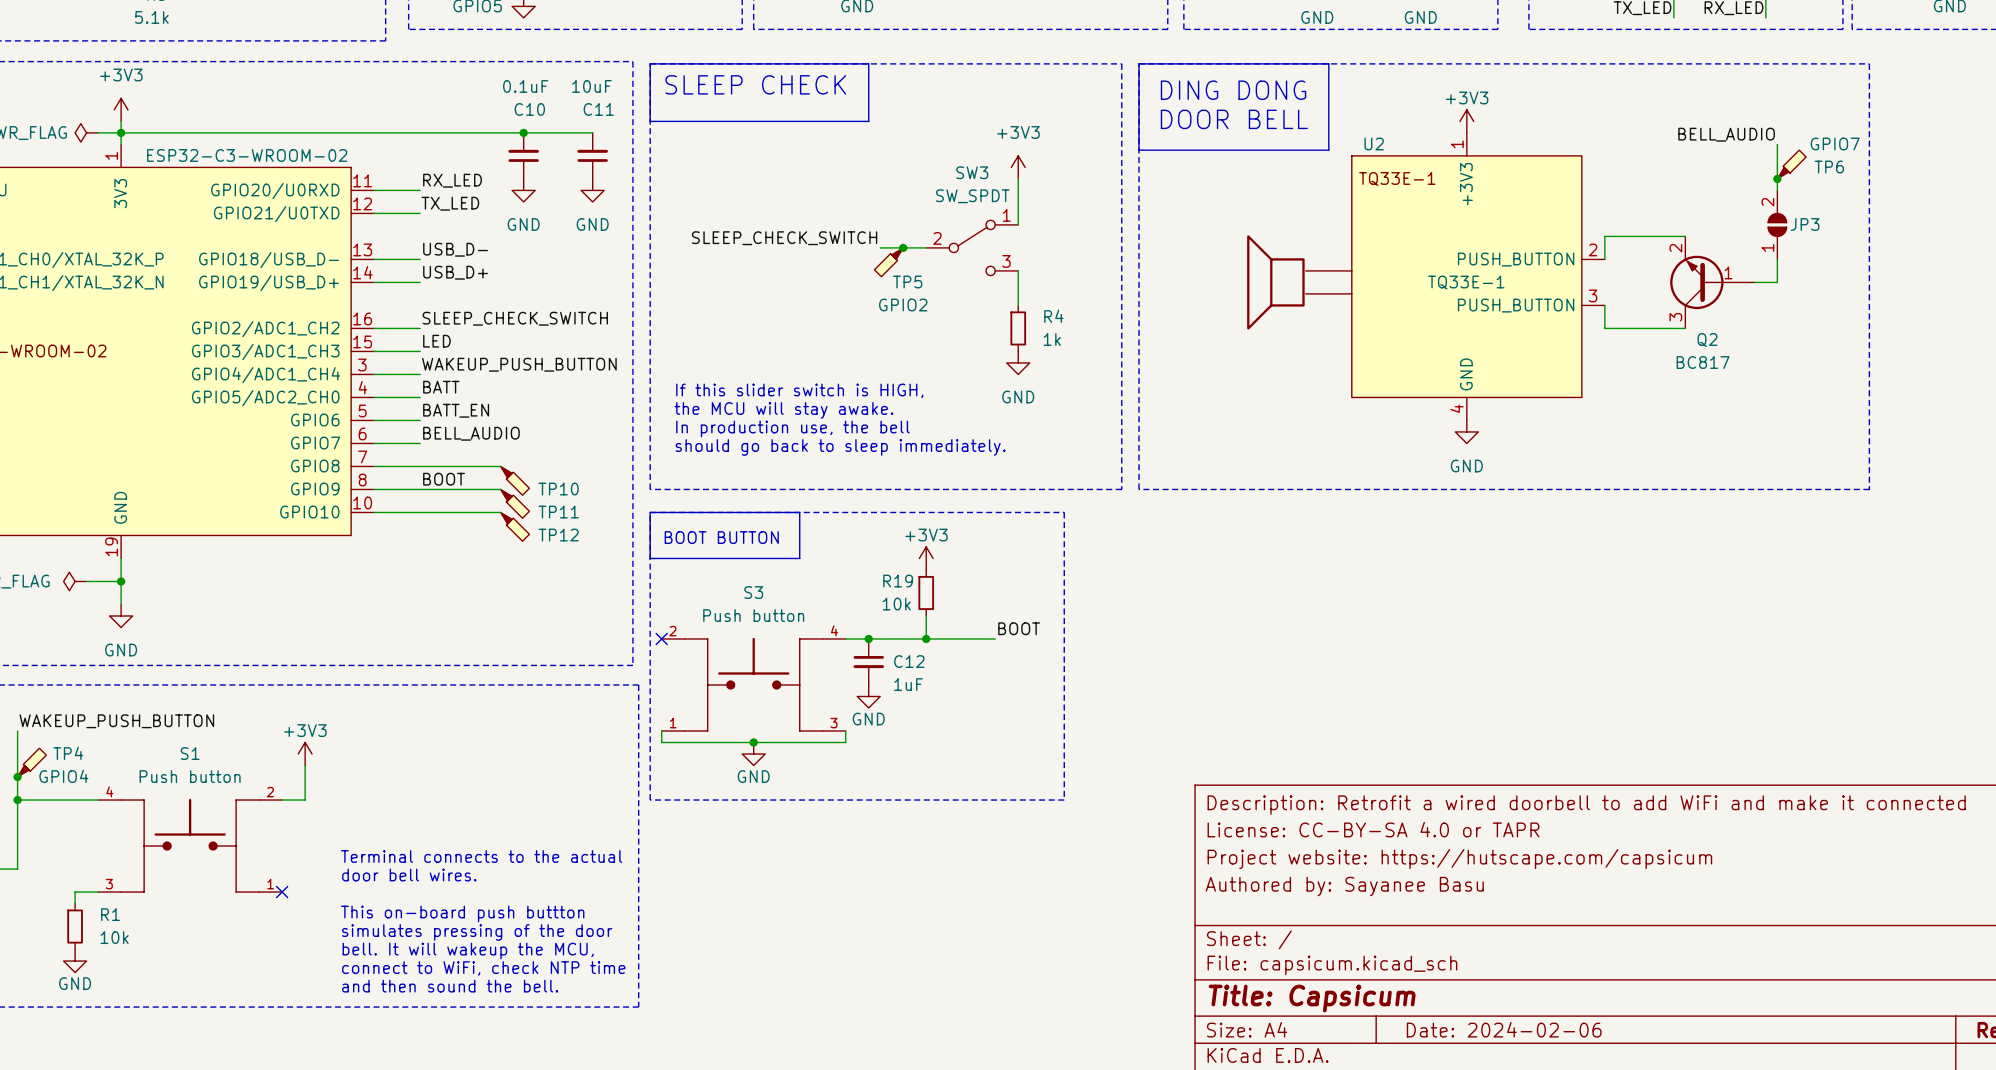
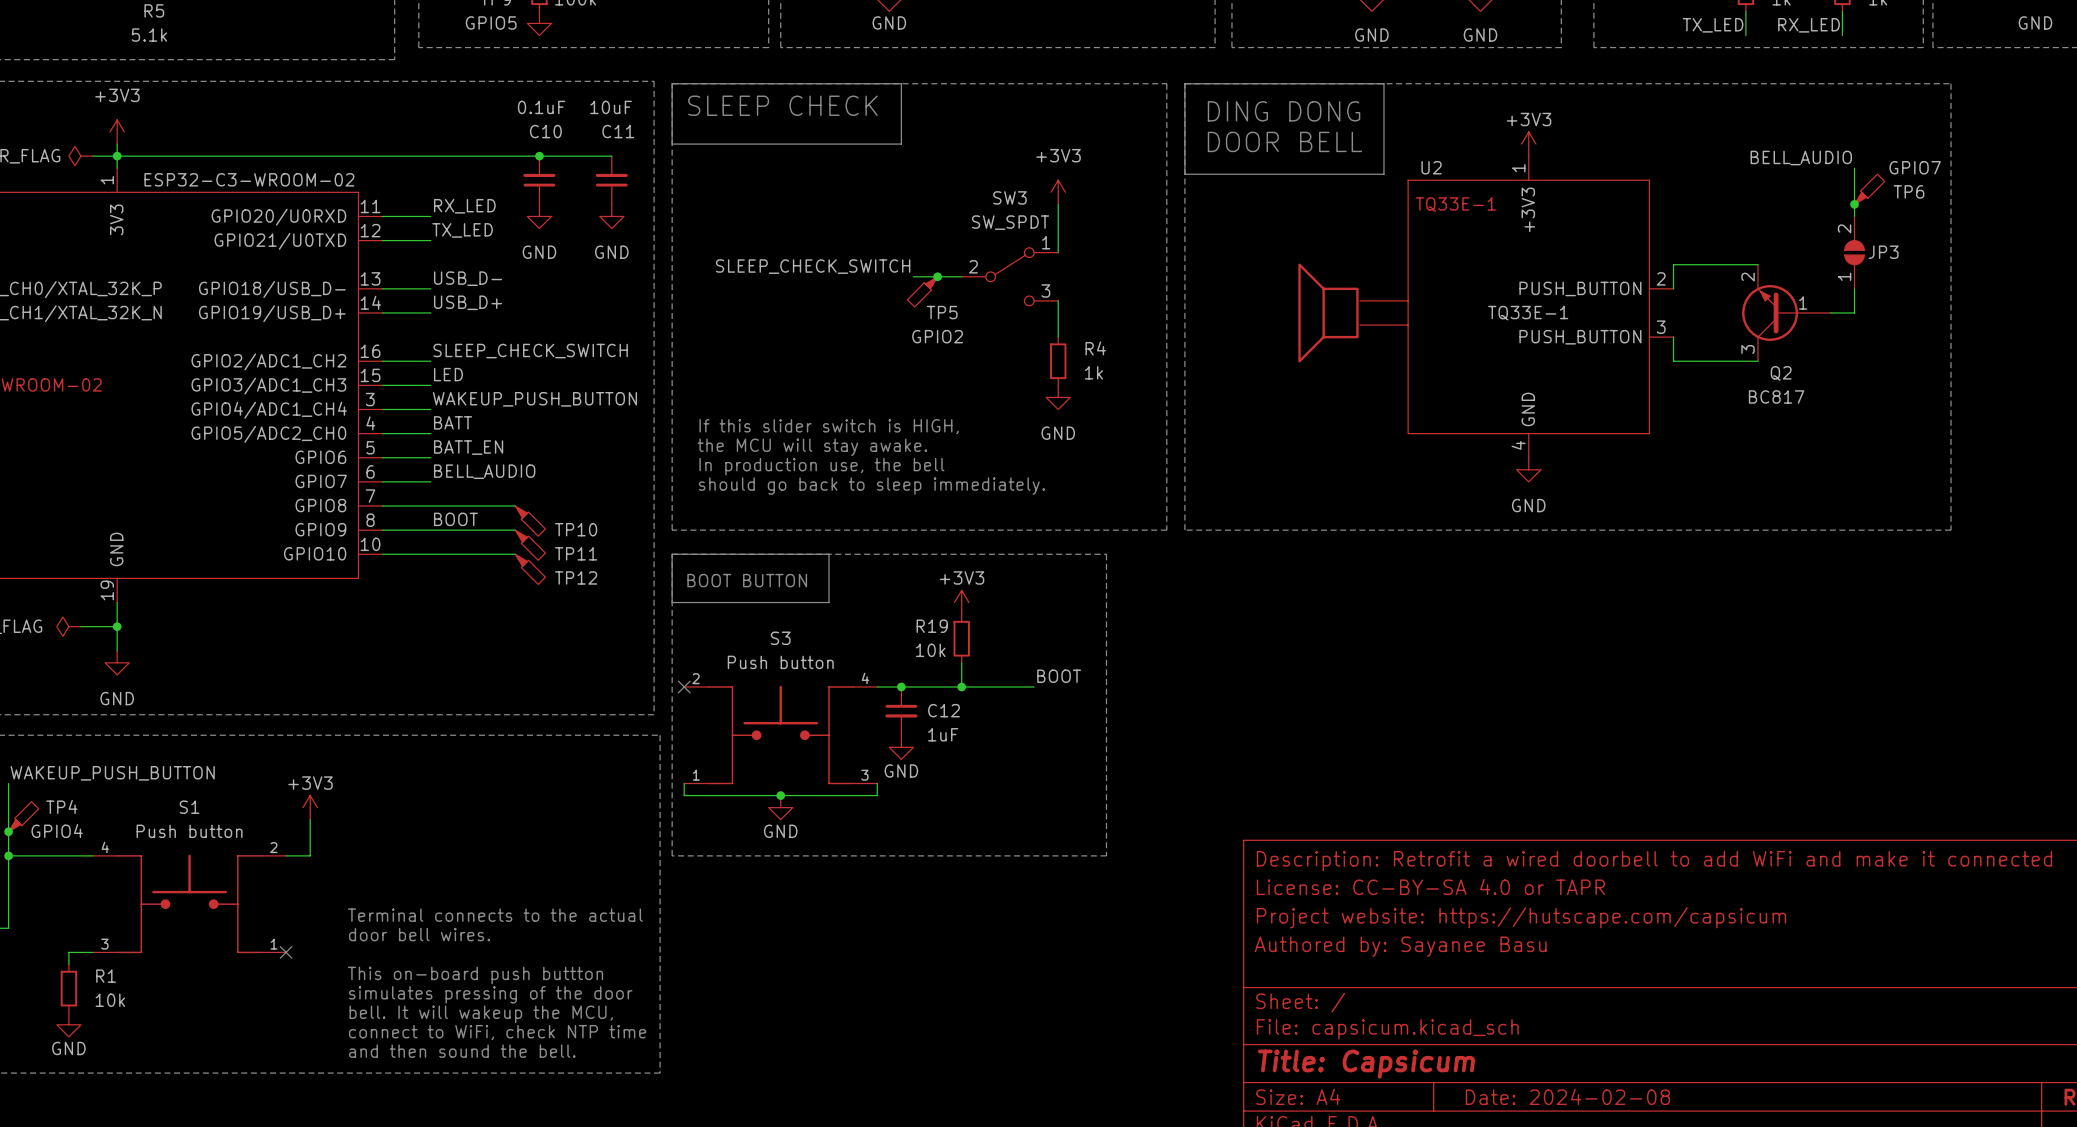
title block: Date: 2024-02-06 (1504, 1029) -> Date: 2024-02-08 (1567, 1096)

